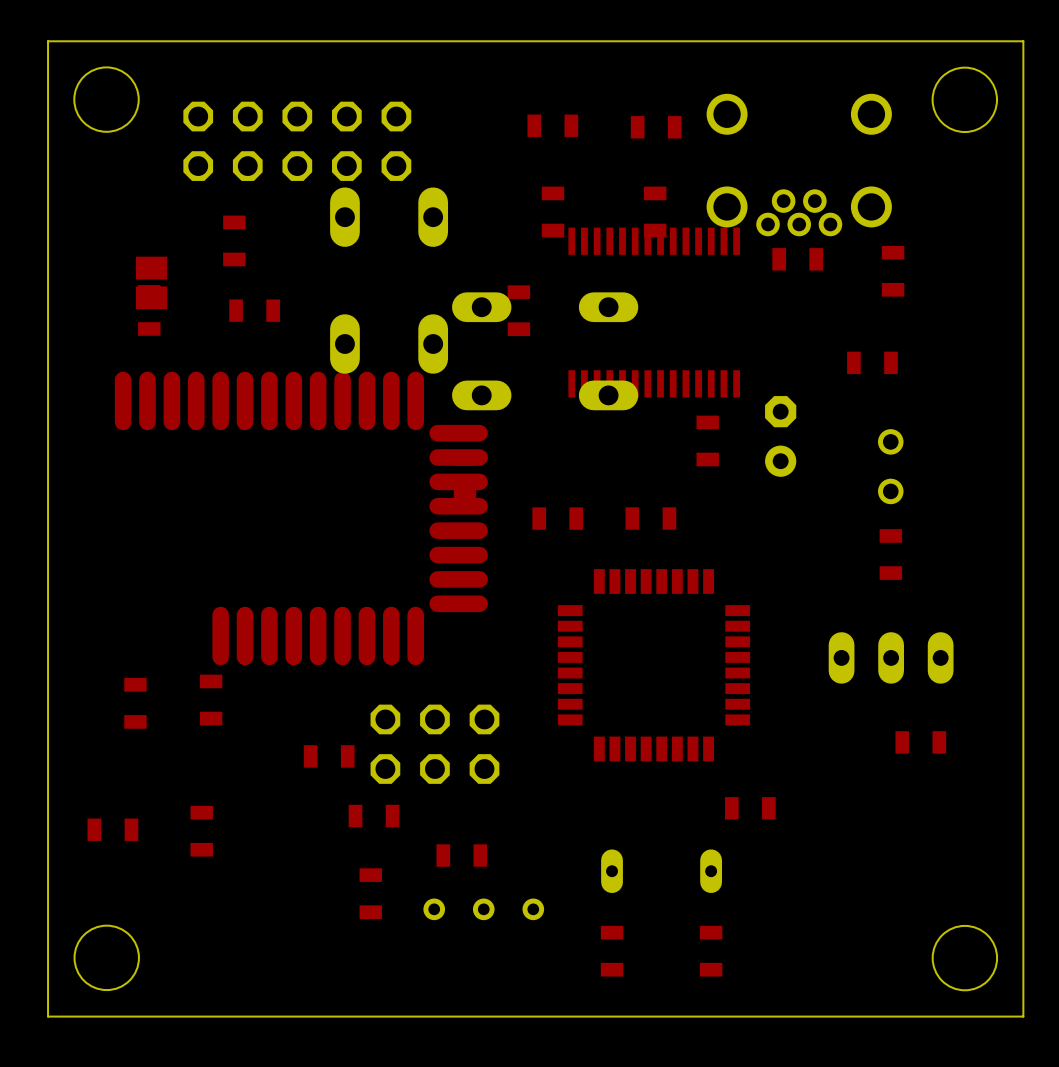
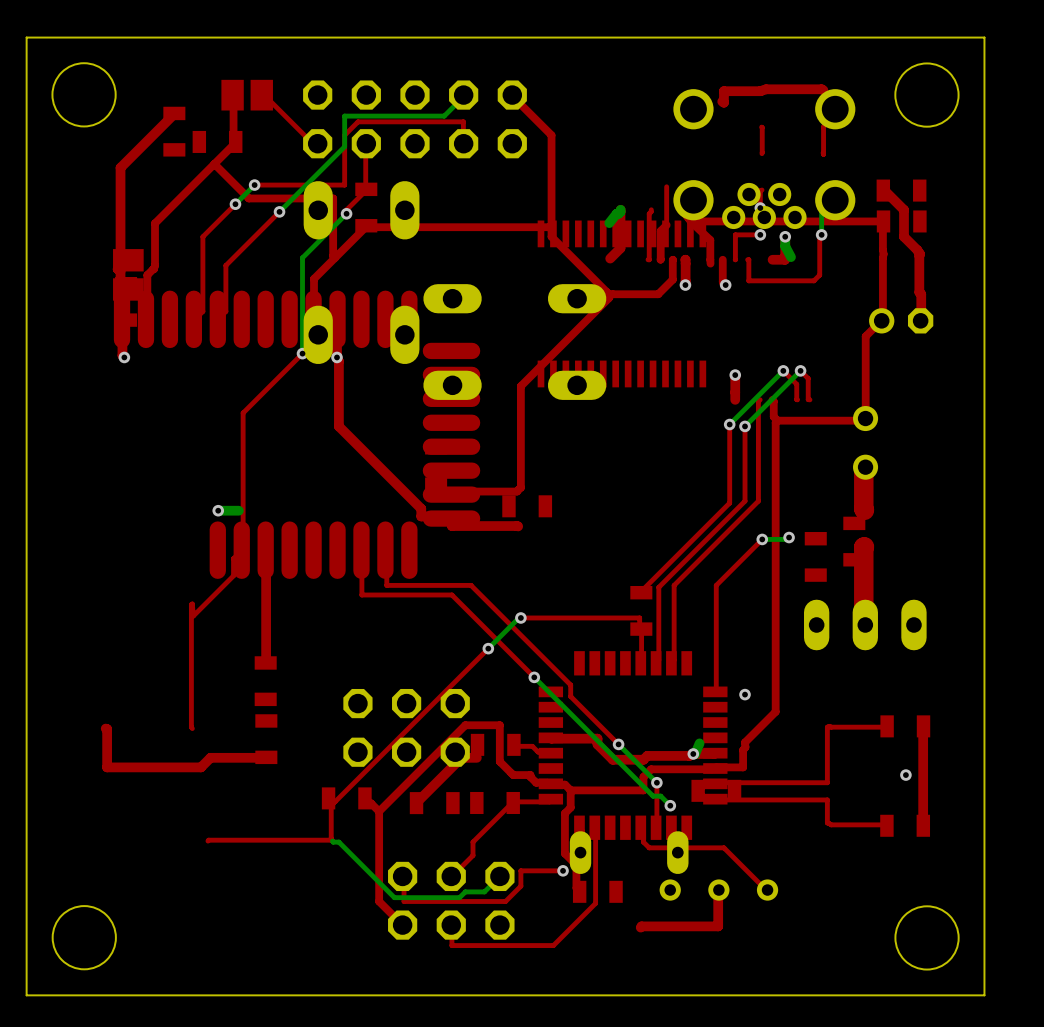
top track: none -> (823, 90) (723, 91) (723, 102) (722, 101)
top track: none -> (262, 91) (261, 95) (264, 95) (314, 144) (317, 143) (315, 144)
top track: none -> (232, 95) (233, 139) (235, 141) (155, 223) (155, 265) (154, 269) (147, 275) (147, 319)
part: none -> (247, 95)
bottom track: none -> (463, 95) (444, 116) (344, 116) (344, 146) (279, 211)
top track: none -> (512, 95) (551, 135) (551, 236) (610, 294)
top track: none -> (174, 113) (120, 167) (120, 265) (117, 269) (120, 271) (120, 315) (122, 322) (122, 355) (124, 357)
part: (552, 125) -> none
part: (656, 127) -> none
top track: none -> (823, 126) (823, 154) (823, 152)
top track: none -> (761, 127) (761, 153)
part: none -> (174, 131)
part position: (297, 141) -> (414, 119)
part: none -> (217, 141)
top track: none -> (366, 143) (366, 189) (346, 209) (346, 213)
top track: none -> (463, 143) (463, 121) (358, 121) (344, 135) (344, 185) (254, 185)
top track: none -> (214, 163) (248, 198) (333, 198) (333, 255) (335, 257)
bottom track: none -> (254, 185) (235, 204)
via: none -> (254, 185)
top track: none -> (666, 186) (666, 225) (660, 231) (660, 259)
top track: none -> (761, 190) (760, 190) (760, 208)
top track: none -> (883, 190) (904, 209) (904, 236) (920, 254) (920, 320)
part: none -> (901, 190)
top track: none -> (235, 204) (202, 236) (202, 311) (193, 319)
via: none -> (235, 204)
part: (552, 211) -> none
part: (655, 211) -> none
part: none -> (366, 207)
via: none -> (760, 208)
bottom track: none -> (821, 208) (821, 234)
bottom track: none -> (620, 209) (609, 223)
top track: none -> (620, 209) (620, 248) (610, 258)
top track: none -> (651, 209) (649, 213) (648, 259)
top track: none -> (279, 211) (225, 265) (225, 311) (217, 319)
via: none -> (279, 211)
bottom track: none -> (346, 213) (302, 257) (302, 353)
via: none -> (346, 213)
part: none -> (901, 221)
top track: none -> (551, 227) (366, 225) (314, 278) (313, 319)
part: (234, 240) -> none
top track: none -> (760, 234) (735, 234) (735, 259)
via: none -> (760, 234)
top track: none -> (821, 234) (819, 236) (819, 275) (813, 280) (748, 280) (747, 259)
via: none -> (821, 234)
bottom track: none -> (785, 236) (785, 246) (790, 257)
top track: none -> (785, 236) (785, 259) (772, 259)
via: none -> (785, 236)
part: (797, 259) -> none
top track: none -> (672, 259) (672, 279) (658, 294) (610, 294)
top track: none -> (685, 259) (685, 284)
top track: none -> (722, 259) (722, 282) (725, 285)
top track: none -> (710, 263) (710, 240) (691, 222) (681, 209) (691, 221) (883, 221) (882, 319) (865, 336) (865, 418)
part: (893, 271) -> none
via: none -> (685, 285)
via: none -> (725, 285)
top track: none -> (610, 294) (520, 386) (520, 487) (517, 491) (451, 491) (451, 494)
part: (254, 310) -> none
part: (518, 310) -> none
top track: none -> (337, 319) (338, 426) (421, 508) (421, 516) (446, 516) (451, 518)
part: none -> (901, 320)
part: (872, 362) -> none
top track: none -> (302, 353) (243, 413) (243, 549) (233, 558) (233, 575) (193, 616) (191, 604) (192, 728)
via: none -> (302, 353)
via: none -> (124, 357)
via: none -> (336, 357)
bottom track: none -> (783, 370) (729, 424)
top track: none -> (783, 370) (796, 384) (797, 399)
via: none -> (783, 370)
bottom track: none -> (800, 370) (745, 426)
top track: none -> (800, 370) (808, 378) (808, 399) (809, 399)
via: none -> (800, 370)
top track: none -> (735, 375) (735, 399)
via: none -> (735, 375)
top track: none -> (760, 399) (758, 401) (758, 501) (674, 585) (674, 660) (671, 663)
top track: none -> (772, 399) (773, 416) (777, 420)
top track: none -> (865, 418) (859, 420) (777, 420)
top track: none -> (777, 420) (775, 422) (775, 711) (745, 742) (743, 767) (651, 769) (643, 776) (643, 790) (570, 790)
top track: none -> (729, 424) (729, 503) (641, 592)
via: none -> (729, 424)
part: (780, 436) -> none
top track: none -> (745, 426) (745, 501) (658, 587) (658, 660) (656, 663)
via: none -> (745, 426)
part: (707, 440) -> none
part position: (890, 466) -> (865, 442)
top track: none -> (865, 467) (863, 468) (864, 510)
part position: (301, 518) -> (297, 434)
part: (650, 518) -> none
via: none -> (218, 510)
bottom track: none -> (238, 510) (218, 510)
top track: none -> (451, 518) (451, 526) (518, 526)
bottom track: none -> (789, 537) (787, 539) (762, 539)
via: none -> (789, 537)
top track: none -> (762, 539) (716, 585) (715, 691)
via: none -> (762, 539)
top track: none -> (864, 546) (863, 623) (865, 624)
top track: none -> (265, 550) (265, 662)
top track: none -> (361, 550) (361, 594) (451, 594) (534, 677)
top track: none -> (385, 550) (386, 585) (471, 585) (570, 685) (570, 696) (618, 744)
part: none -> (815, 556)
part: none -> (641, 610)
bottom track: none -> (520, 617) (488, 648)
top track: none -> (520, 617) (639, 617) (639, 627) (641, 629) (640, 663)
via: none -> (520, 617)
part position: (891, 657) -> (865, 624)
top track: none -> (488, 648) (333, 802) (331, 805) (332, 841) (207, 841)
via: none -> (488, 648)
part position: (653, 665) -> (633, 745)
bottom track: none -> (534, 677) (653, 796) (660, 796) (670, 805)
via: none -> (534, 677)
part: none -> (265, 681)
part: (211, 699) -> none
part: (135, 703) -> none
via: none -> (745, 694)
part position: (920, 742) -> (905, 726)
top track: none -> (887, 726) (827, 727) (827, 782) (715, 783)
top track: none -> (923, 726) (923, 825)
top track: none -> (105, 728) (107, 767) (200, 767) (210, 757) (266, 757)
top track: none -> (550, 737) (597, 738) (597, 744) (612, 759) (643, 759) (647, 755) (689, 755) (693, 753) (715, 753)
part: none -> (266, 739)
part: (329, 756) -> none
bottom track: none -> (699, 743) (695, 753) (693, 753)
part: none -> (495, 744)
top track: none -> (513, 744) (532, 746) (538, 752) (550, 753)
bottom track: none -> (618, 744) (656, 782)
via: none -> (618, 744)
via: none -> (693, 753)
top track: none -> (476, 757) (461, 757) (457, 759) (416, 803)
via: none -> (905, 775)
top track: none -> (656, 782) (656, 827)
via: none -> (656, 782)
top track: none -> (570, 790) (570, 807) (564, 813) (564, 853) (576, 865) (576, 888) (579, 891)
top track: none -> (570, 790) (564, 784) (536, 782) (530, 775) (513, 775) (499, 761) (499, 725) (465, 725) (379, 811)
top track: none -> (550, 799) (549, 801) (513, 801) (473, 842) (473, 855) (451, 876)
top track: none -> (715, 799) (827, 799) (827, 822) (831, 824) (886, 825)
top track: none -> (369, 802) (379, 811)
part: none -> (495, 802)
via: none -> (670, 805)
part: (112, 829) -> none
top track: none -> (379, 811) (379, 901) (402, 925)
part: (201, 831) -> none
part: none -> (905, 825)
top track: none -> (594, 827) (595, 903) (553, 945) (451, 945) (451, 925)
top track: none -> (640, 827) (643, 830) (643, 842) (649, 847) (723, 847) (767, 890)
part position: (461, 855) -> (434, 803)
bottom track: none -> (332, 841) (338, 842) (394, 897) (459, 897) (465, 891) (484, 891) (499, 876)
top track: none -> (563, 870) (520, 870) (520, 886) (505, 901) (404, 901) (402, 876)
via: none -> (563, 870)
part: (370, 893) -> none
part footprint: [423, 898, 545, 921] -> [388, 861, 515, 940]
top track: none -> (718, 890) (718, 926) (640, 927)
part: none -> (718, 890)
part rotation: 0° (612, 951) -> 90° clockwise (597, 891)
part position: (612, 951) -> (597, 891)
part: (711, 951) -> none

